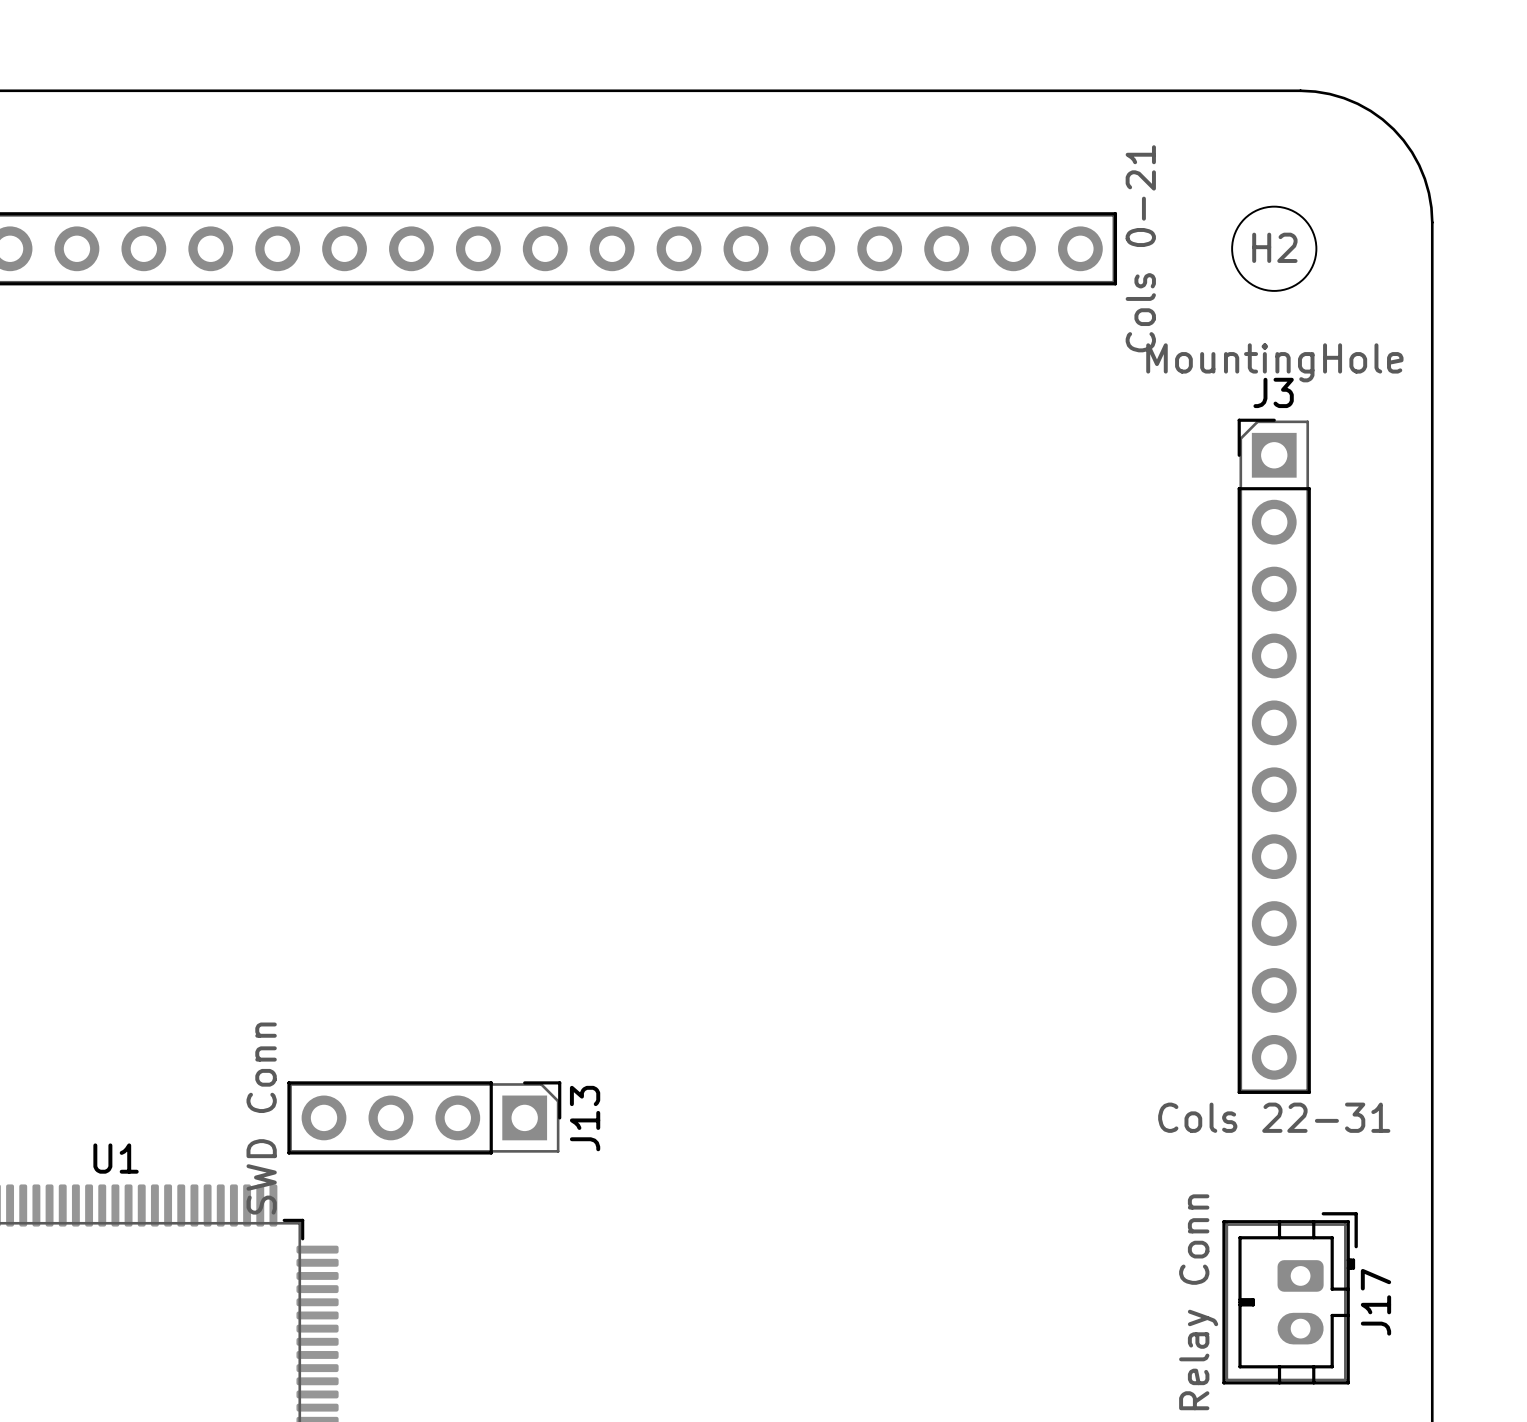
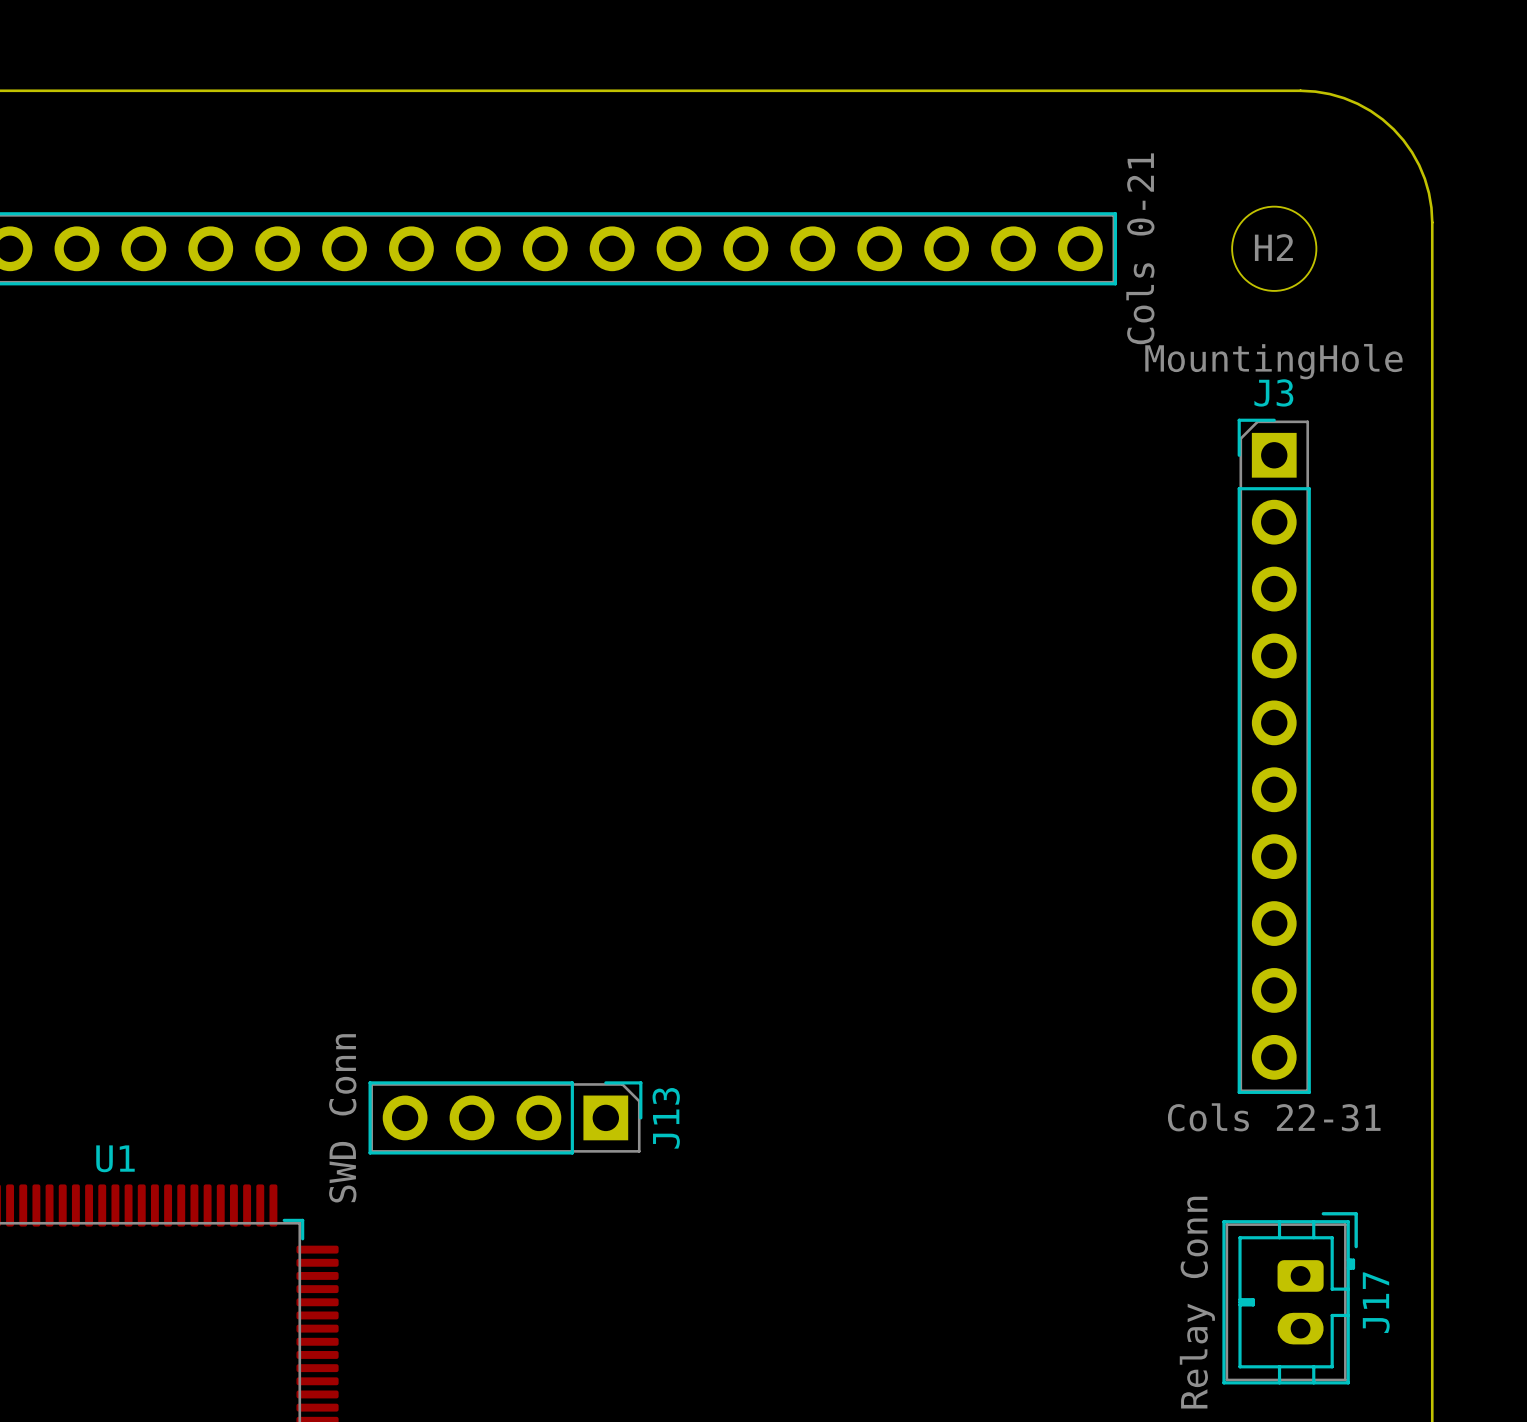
J13 position: (424, 1117) -> (505, 1117)

